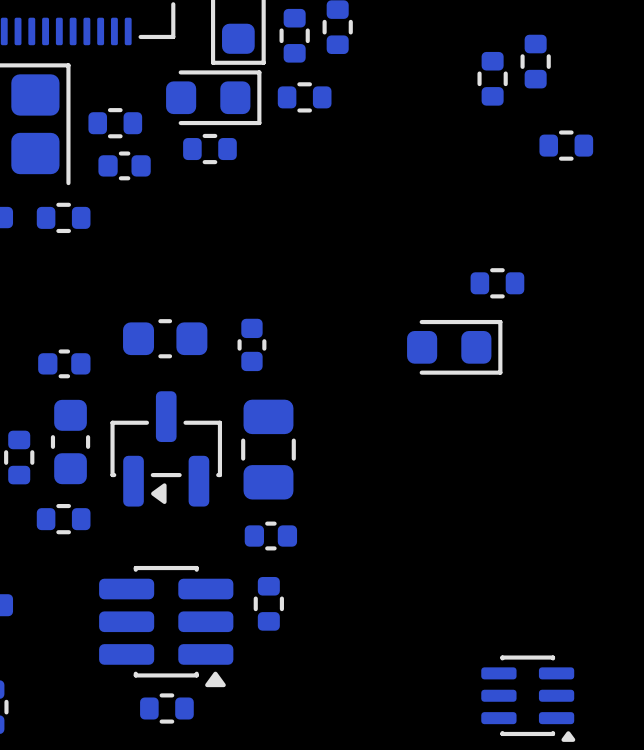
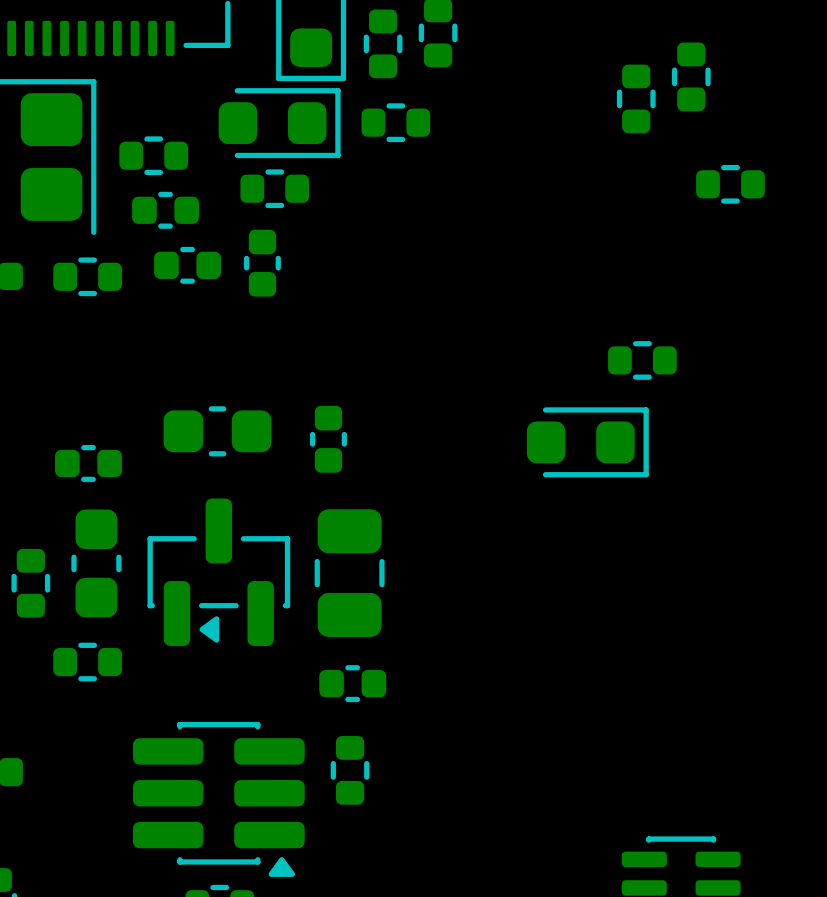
part: none -> (262, 263)
part: none -> (187, 265)

